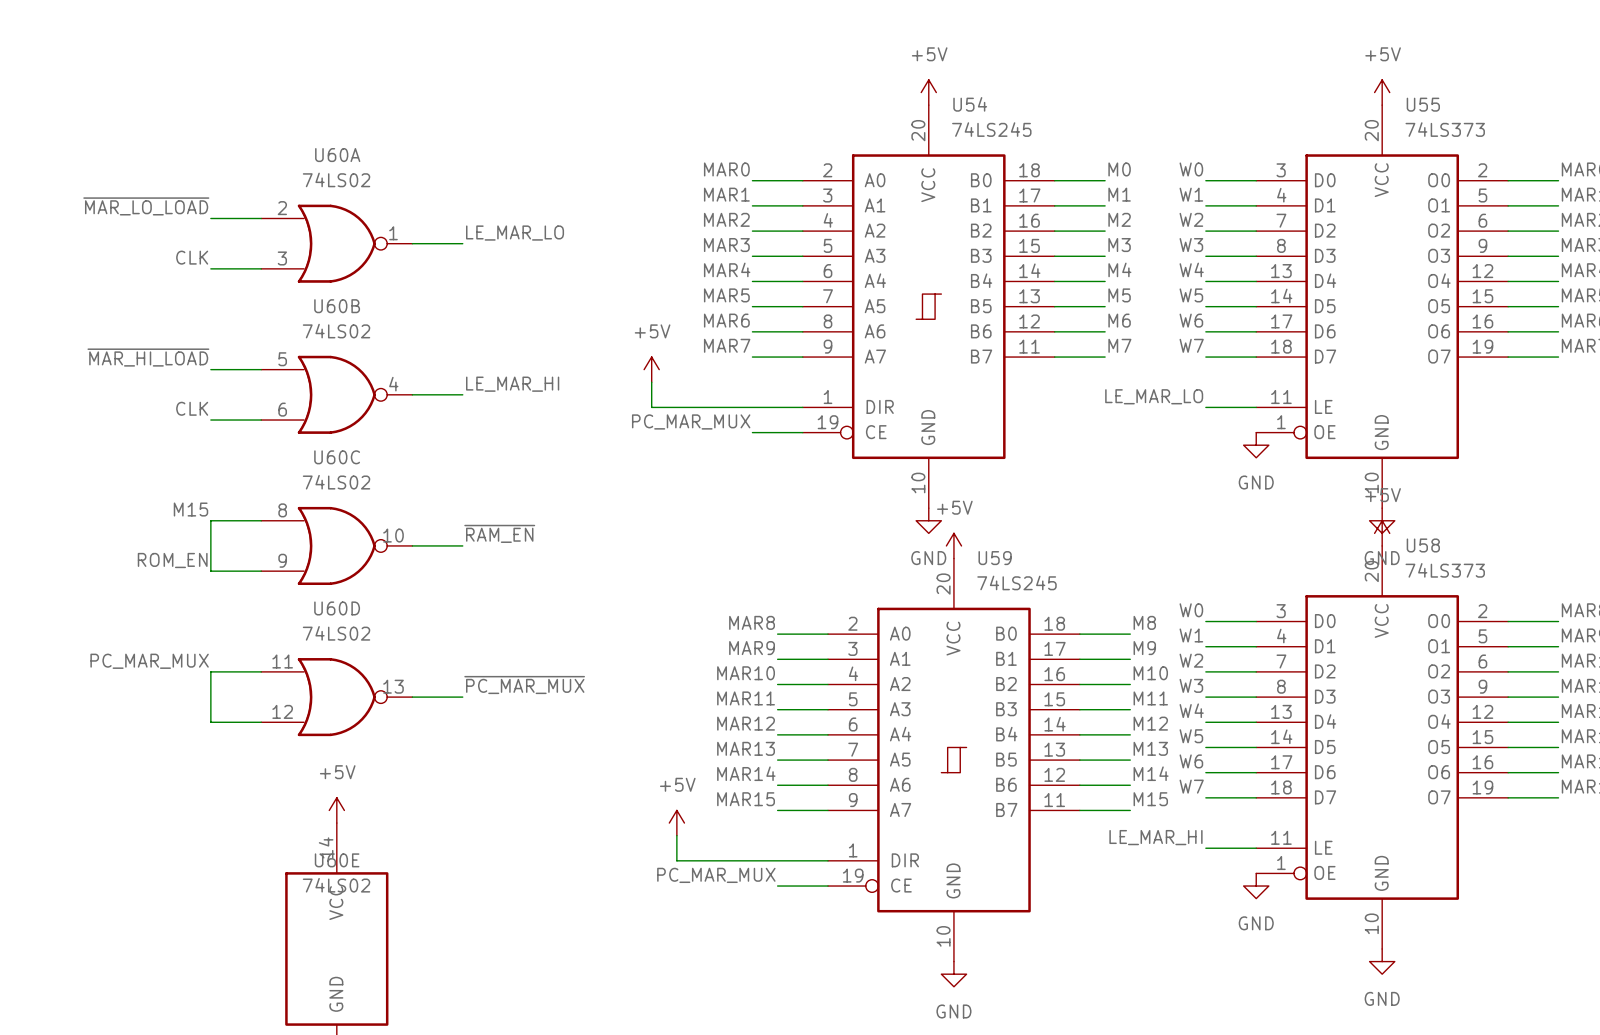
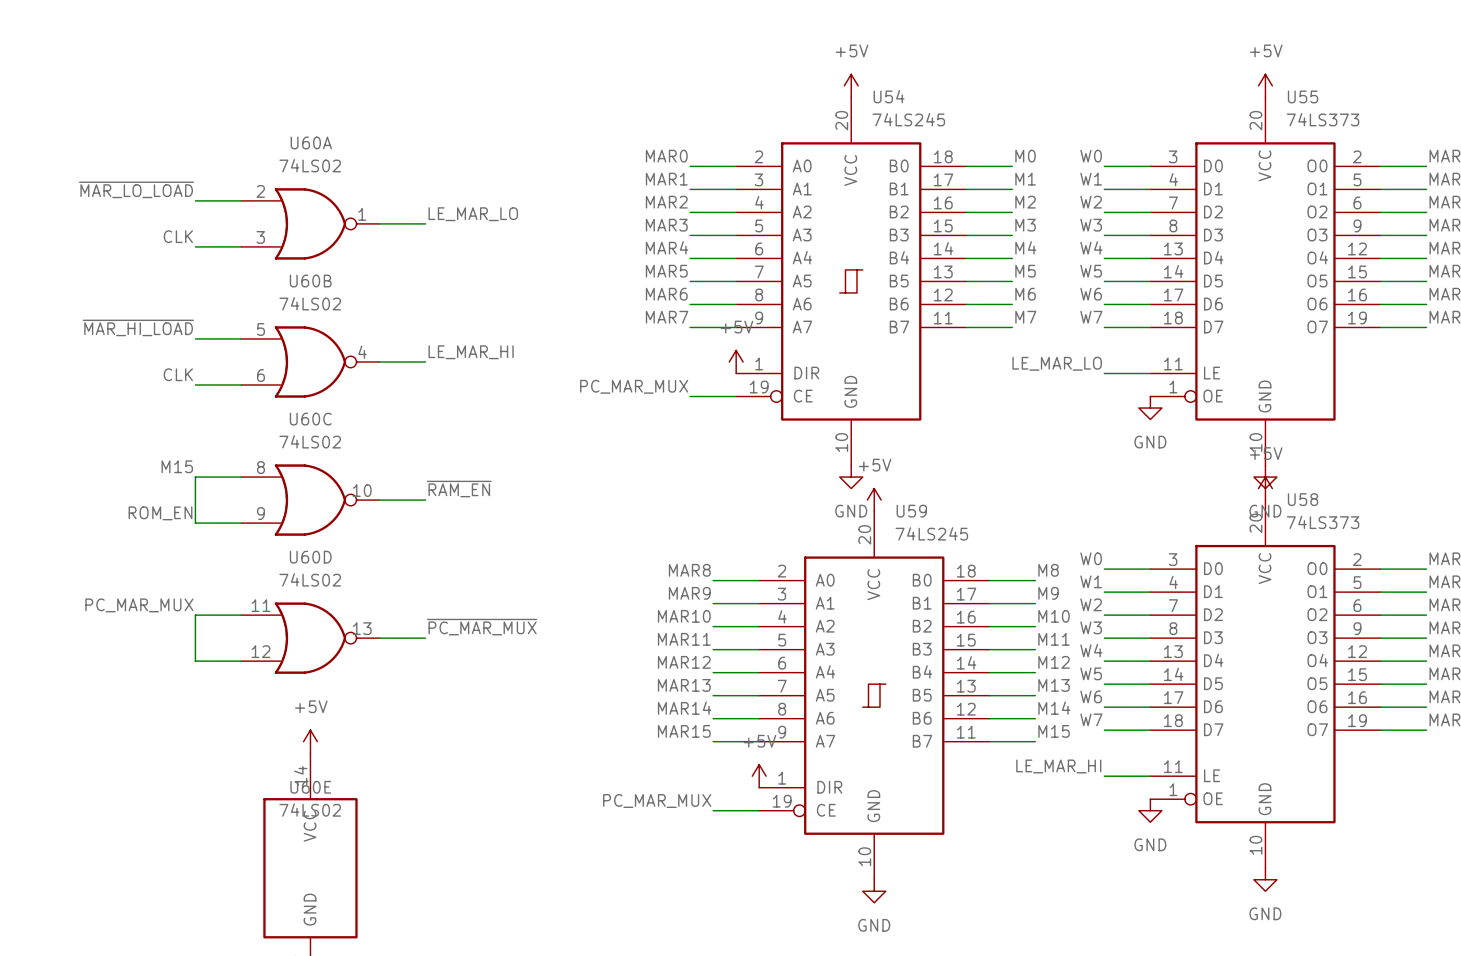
power symbol position: +5V (651, 369) -> +5V (736, 361)
wire: (651, 382) (651, 407) (802, 407) -> none
power symbol position: +5V (676, 823) -> +5V (759, 776)
wire: (676, 835) (676, 860) (828, 860) -> none

